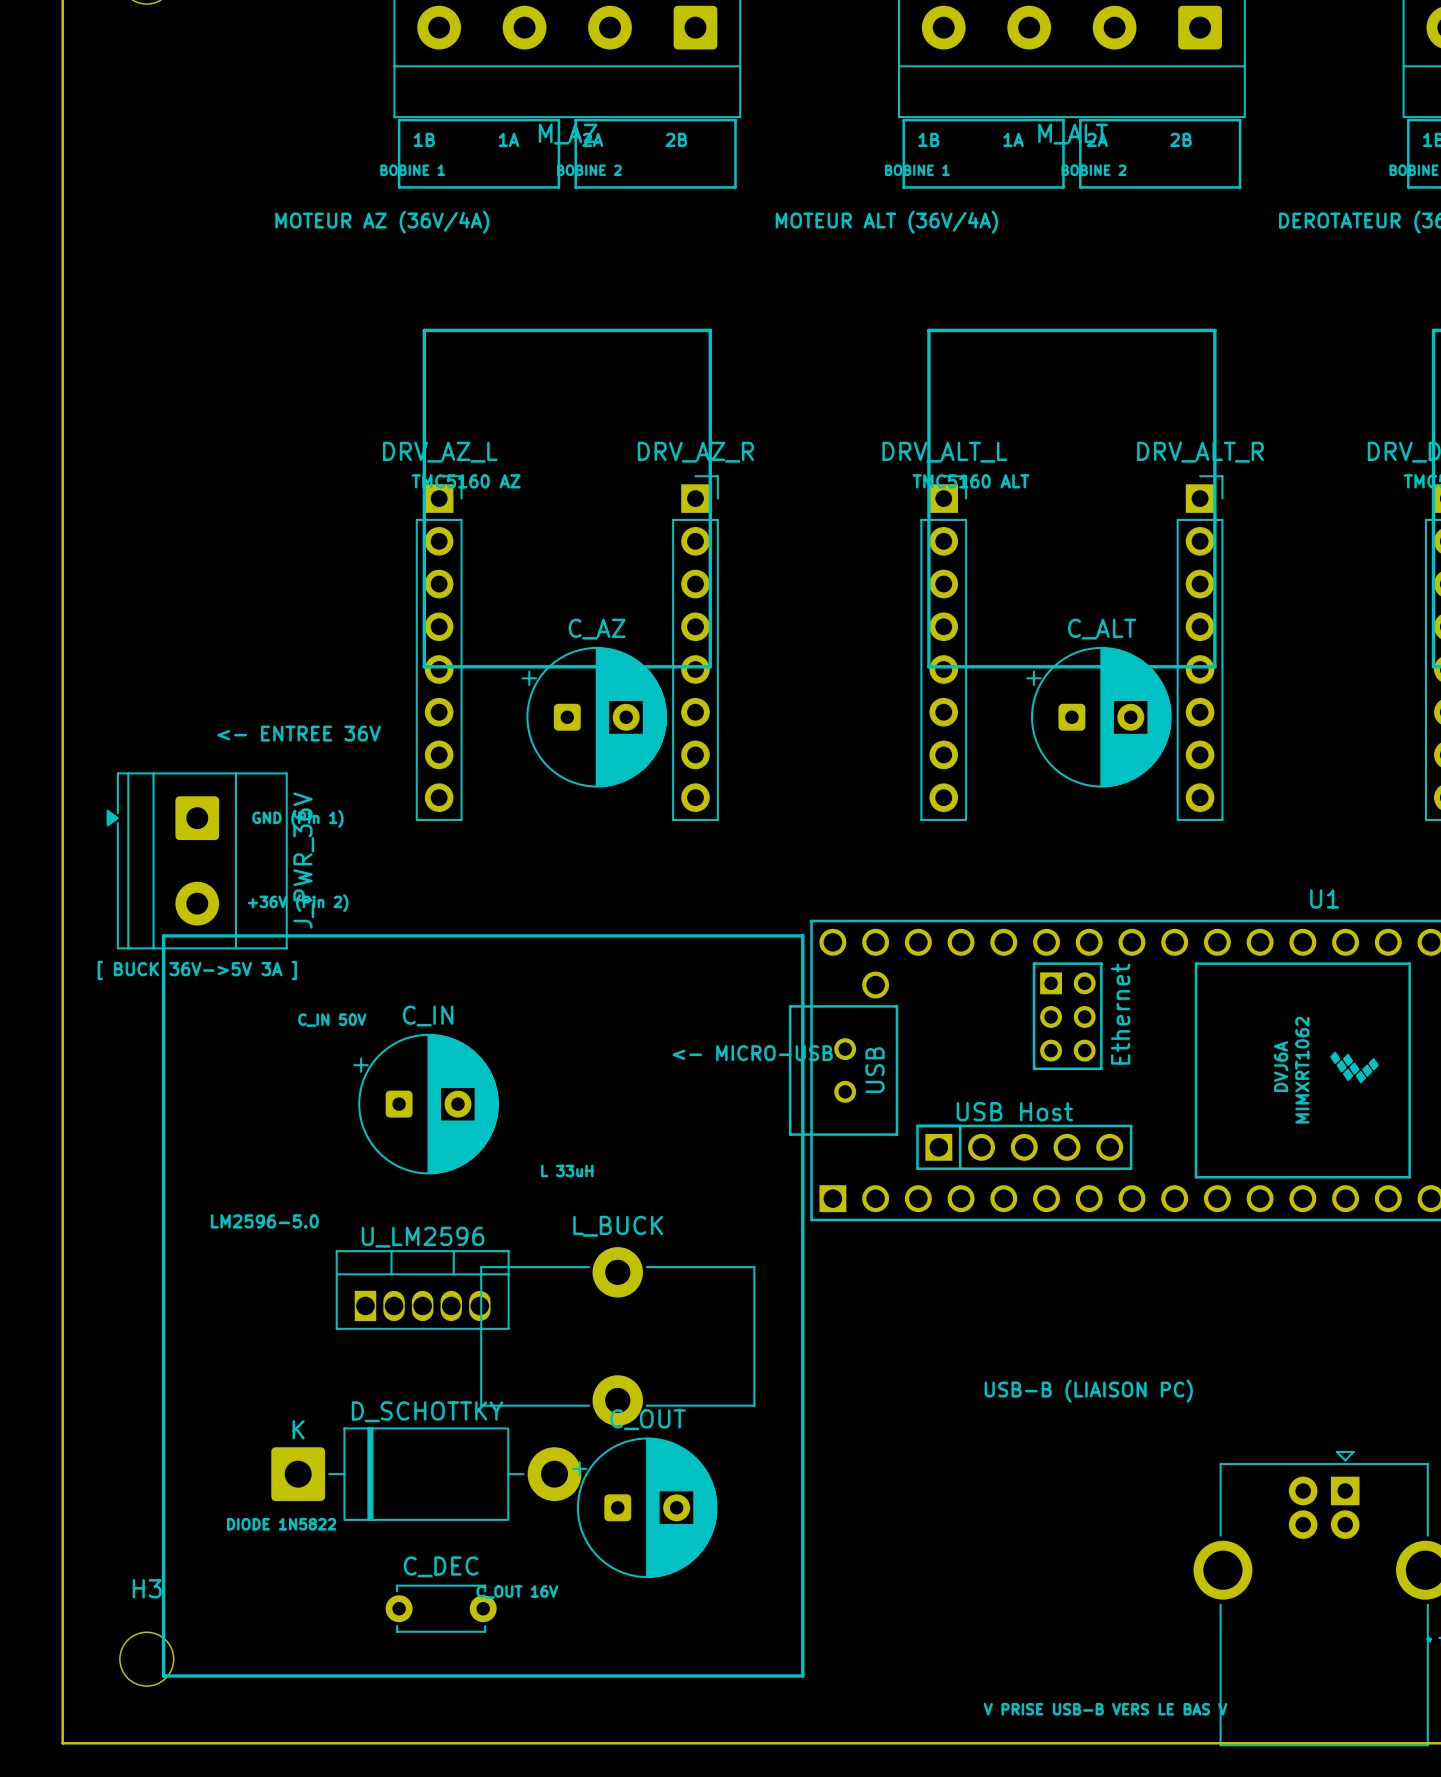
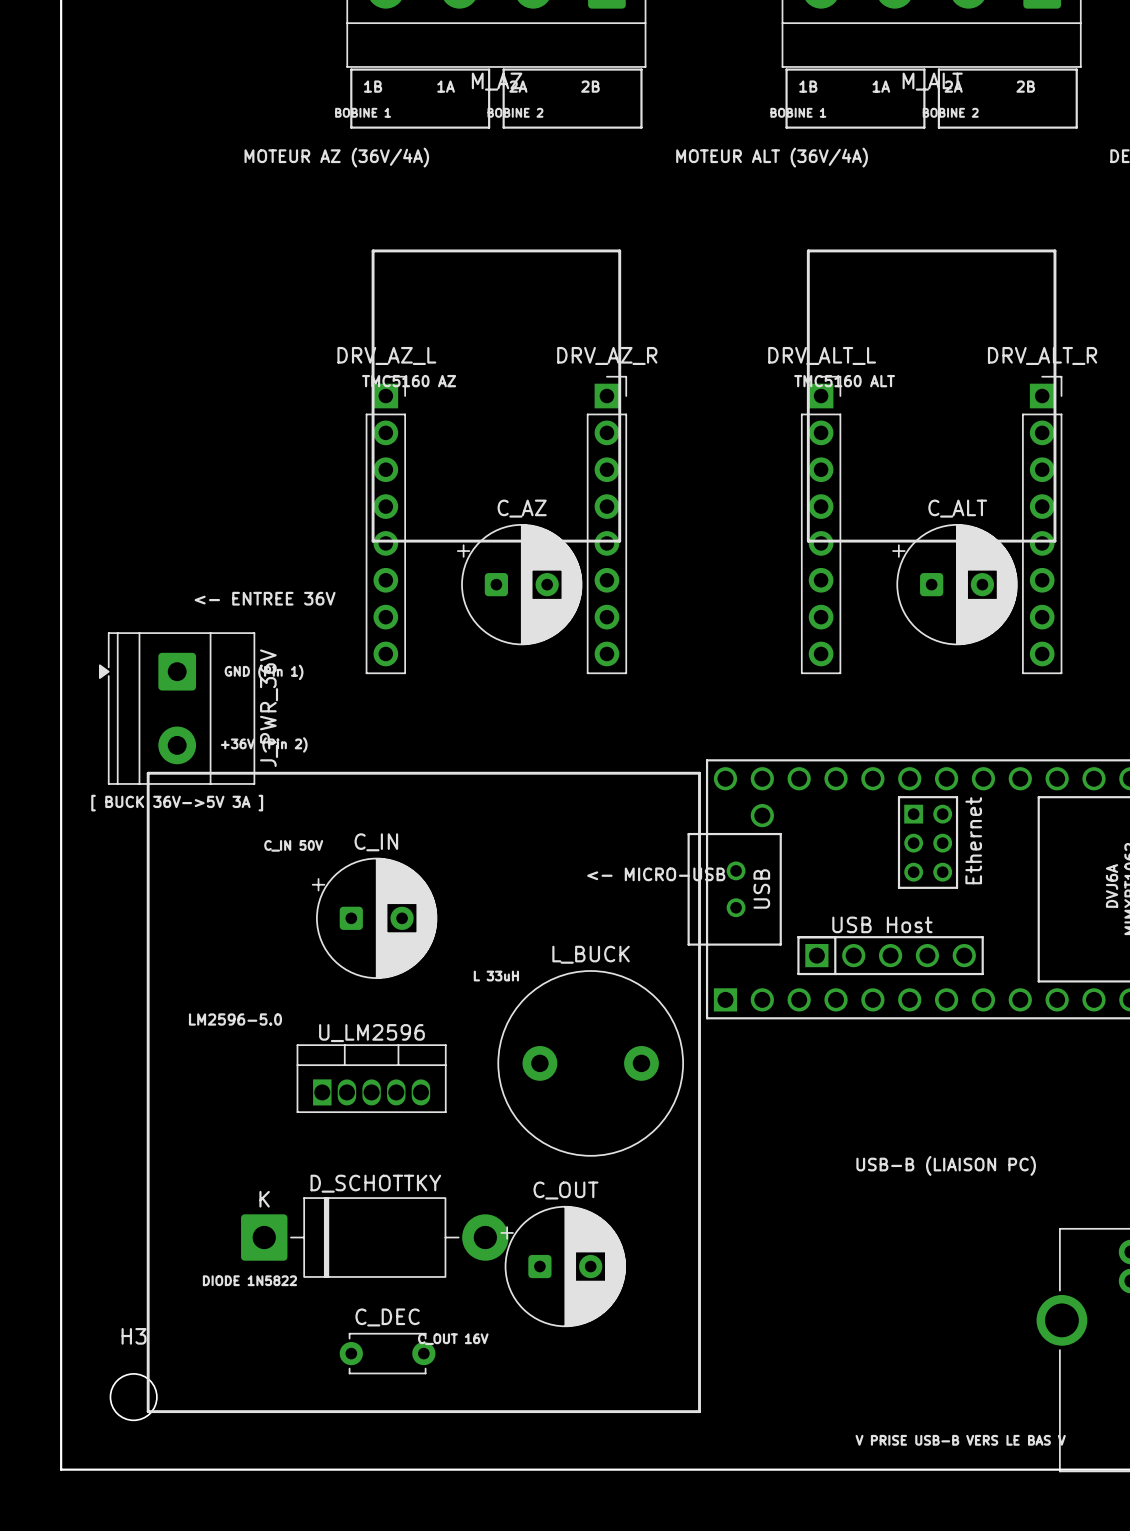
L_BUCK: none -> (590, 1063)
L_BUCK: (617, 1336) -> none

